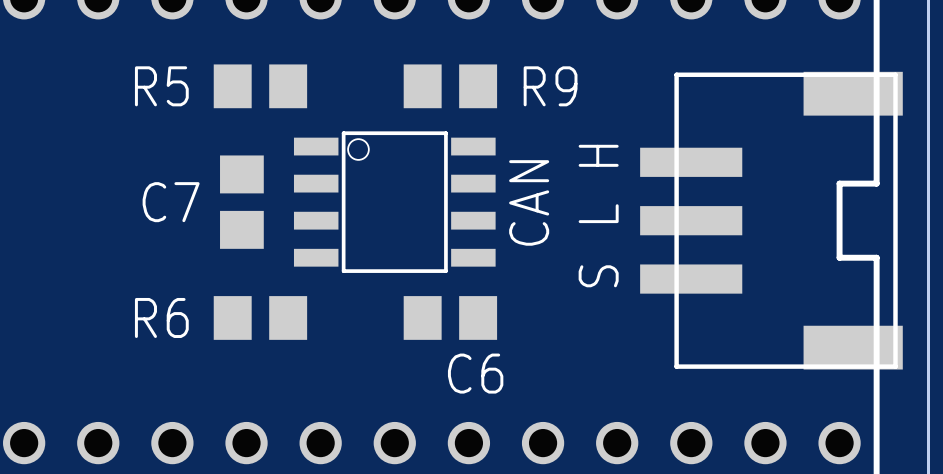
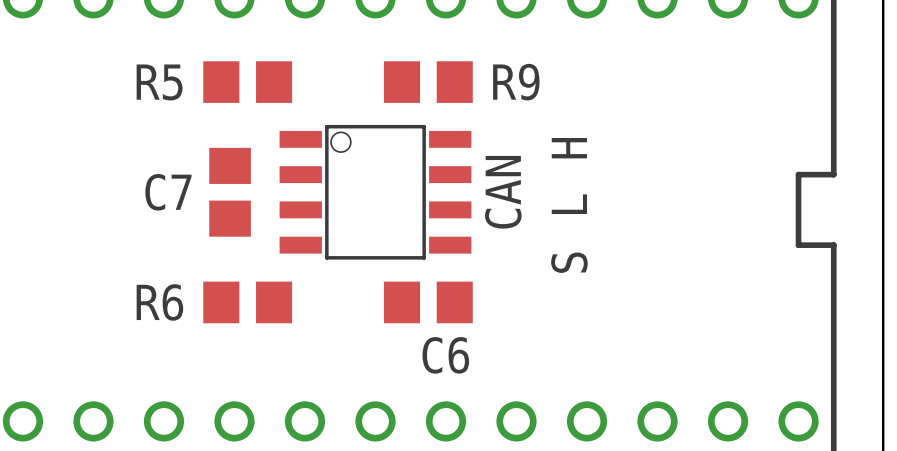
part: (771, 220) -> none

